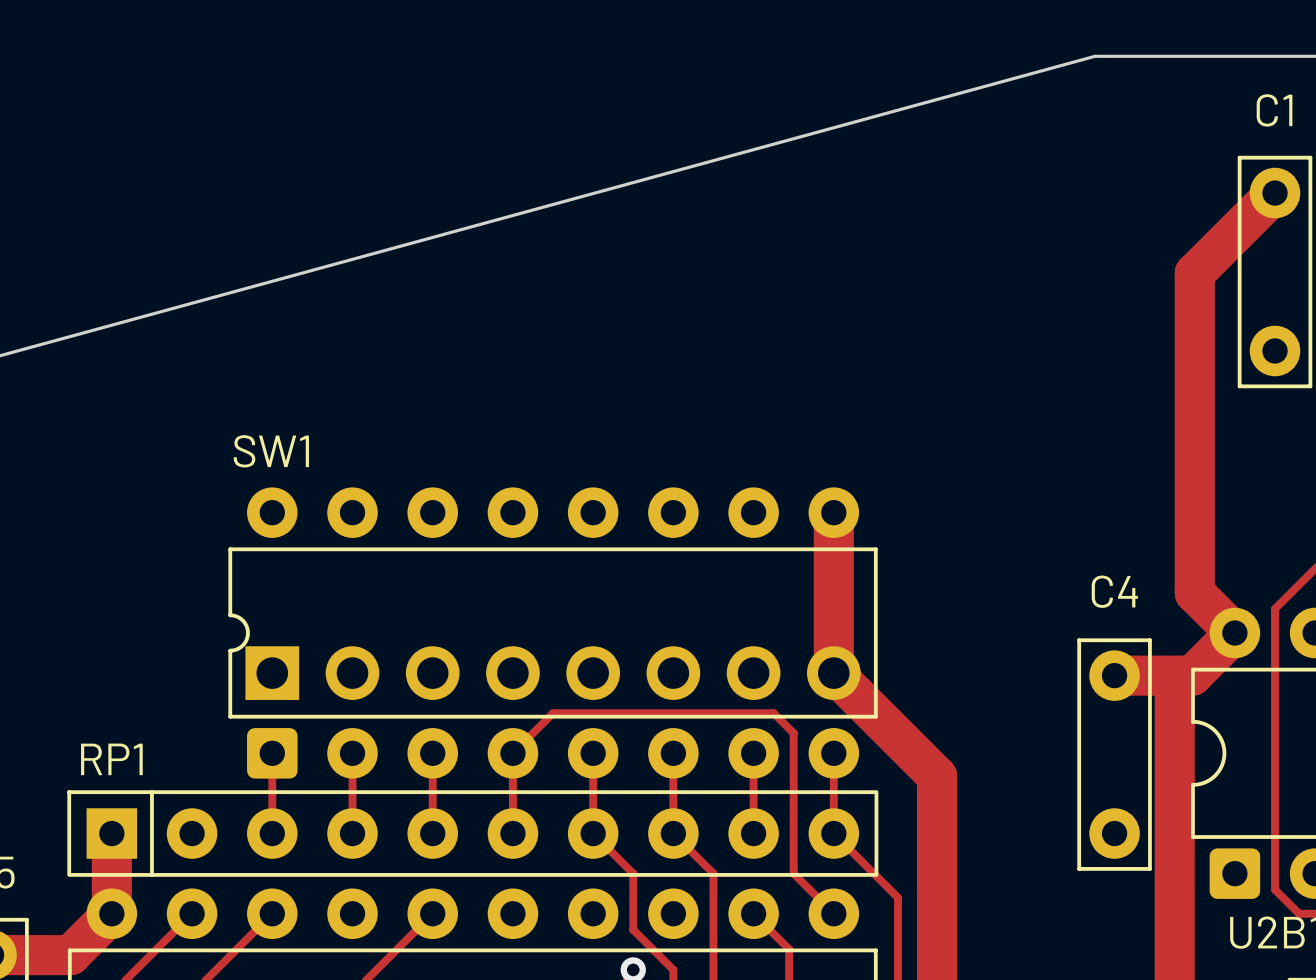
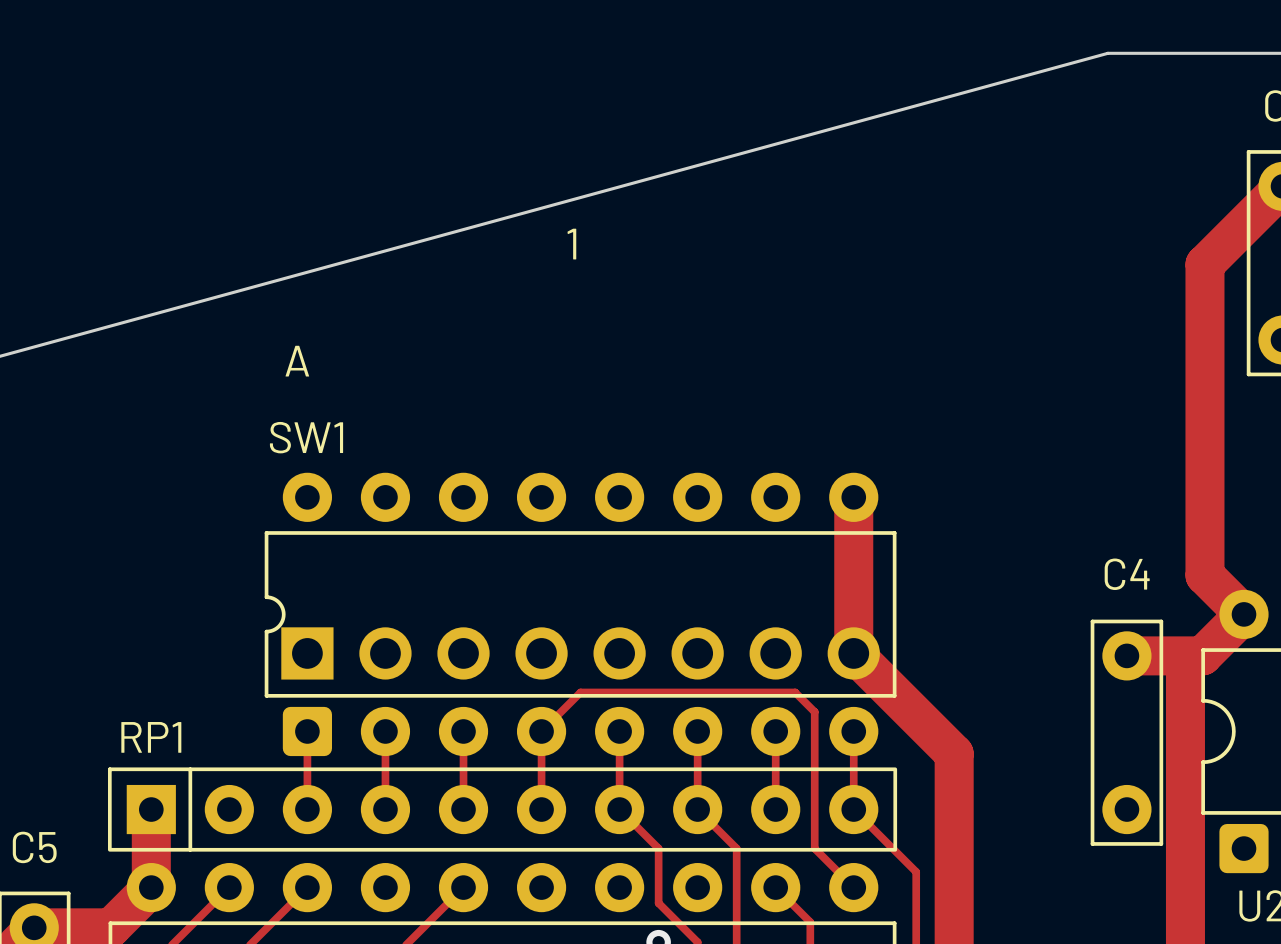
text: none -> 1 (571, 244)
text: none -> A (297, 361)

